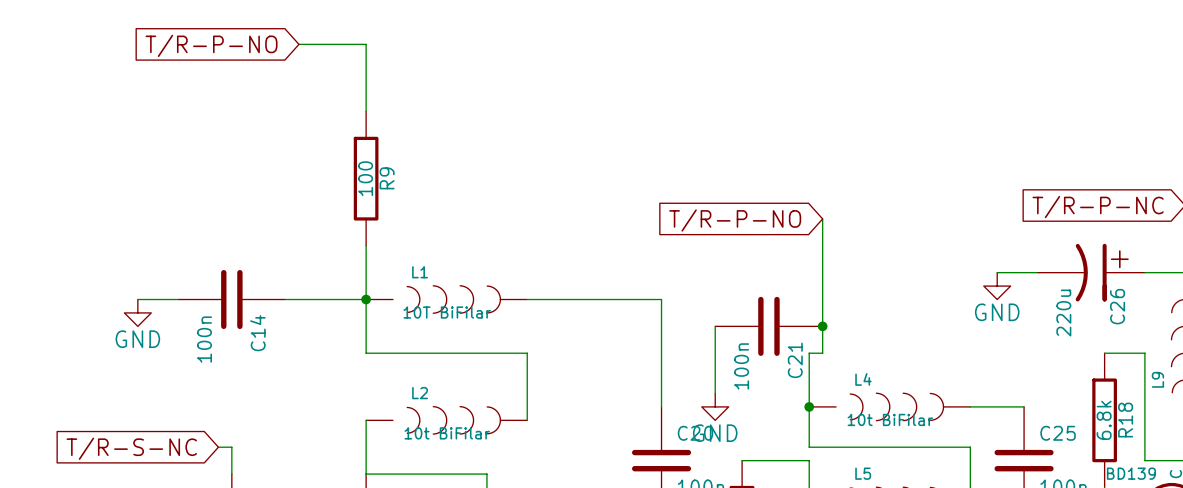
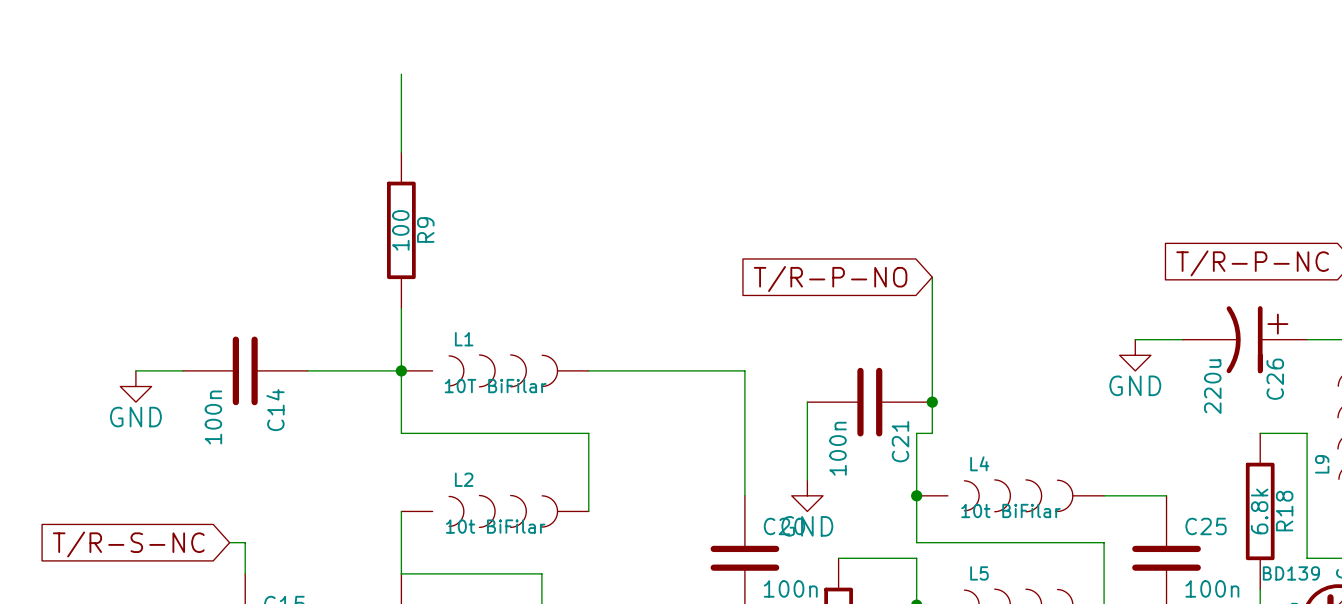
wire: (298, 44) (366, 44) -> none
global label: T/R-P-NO (211, 45) -> none

